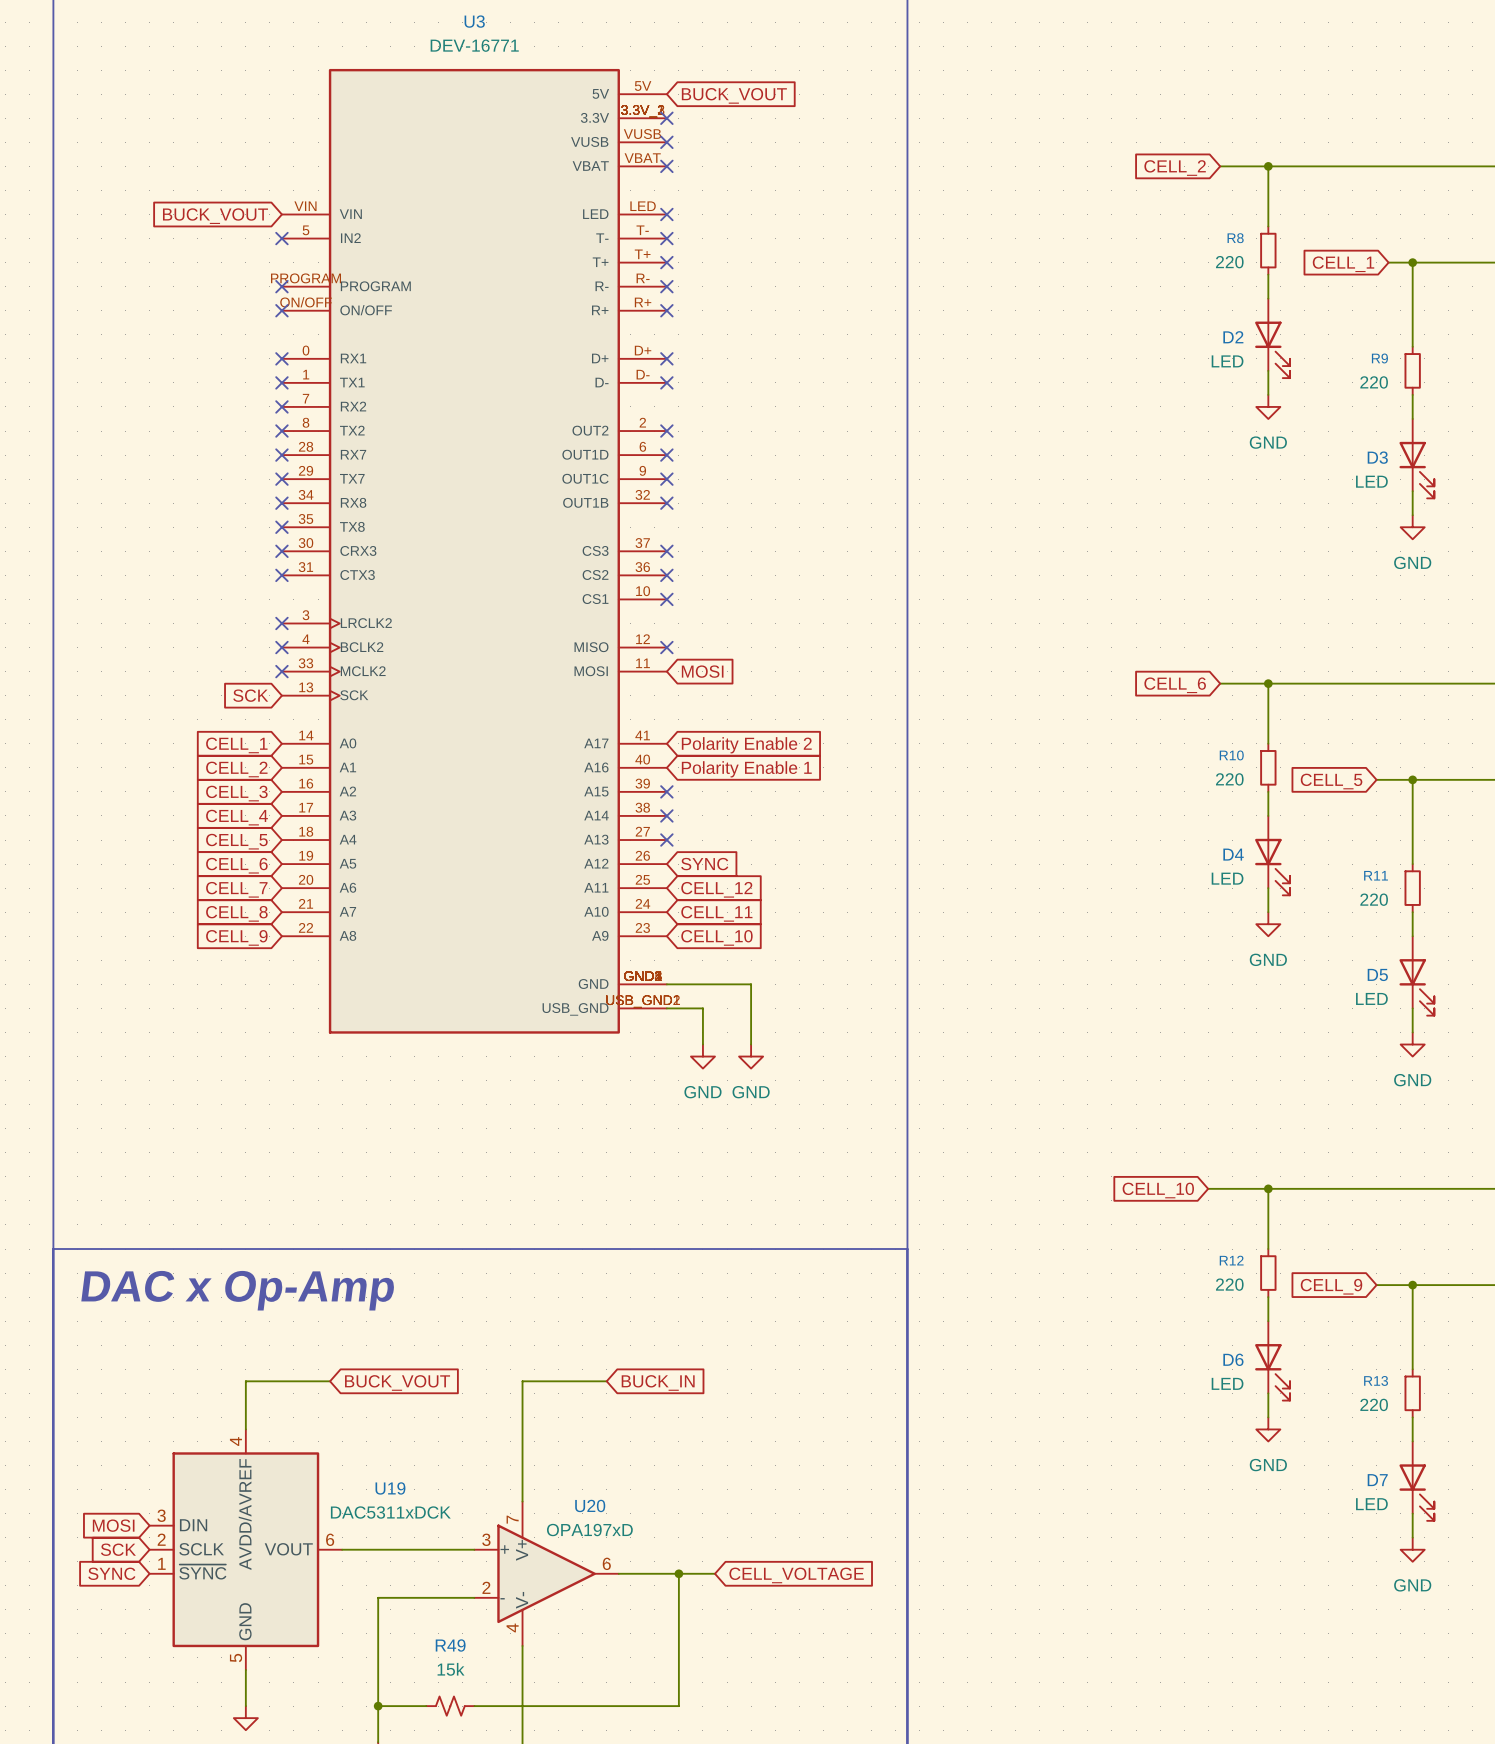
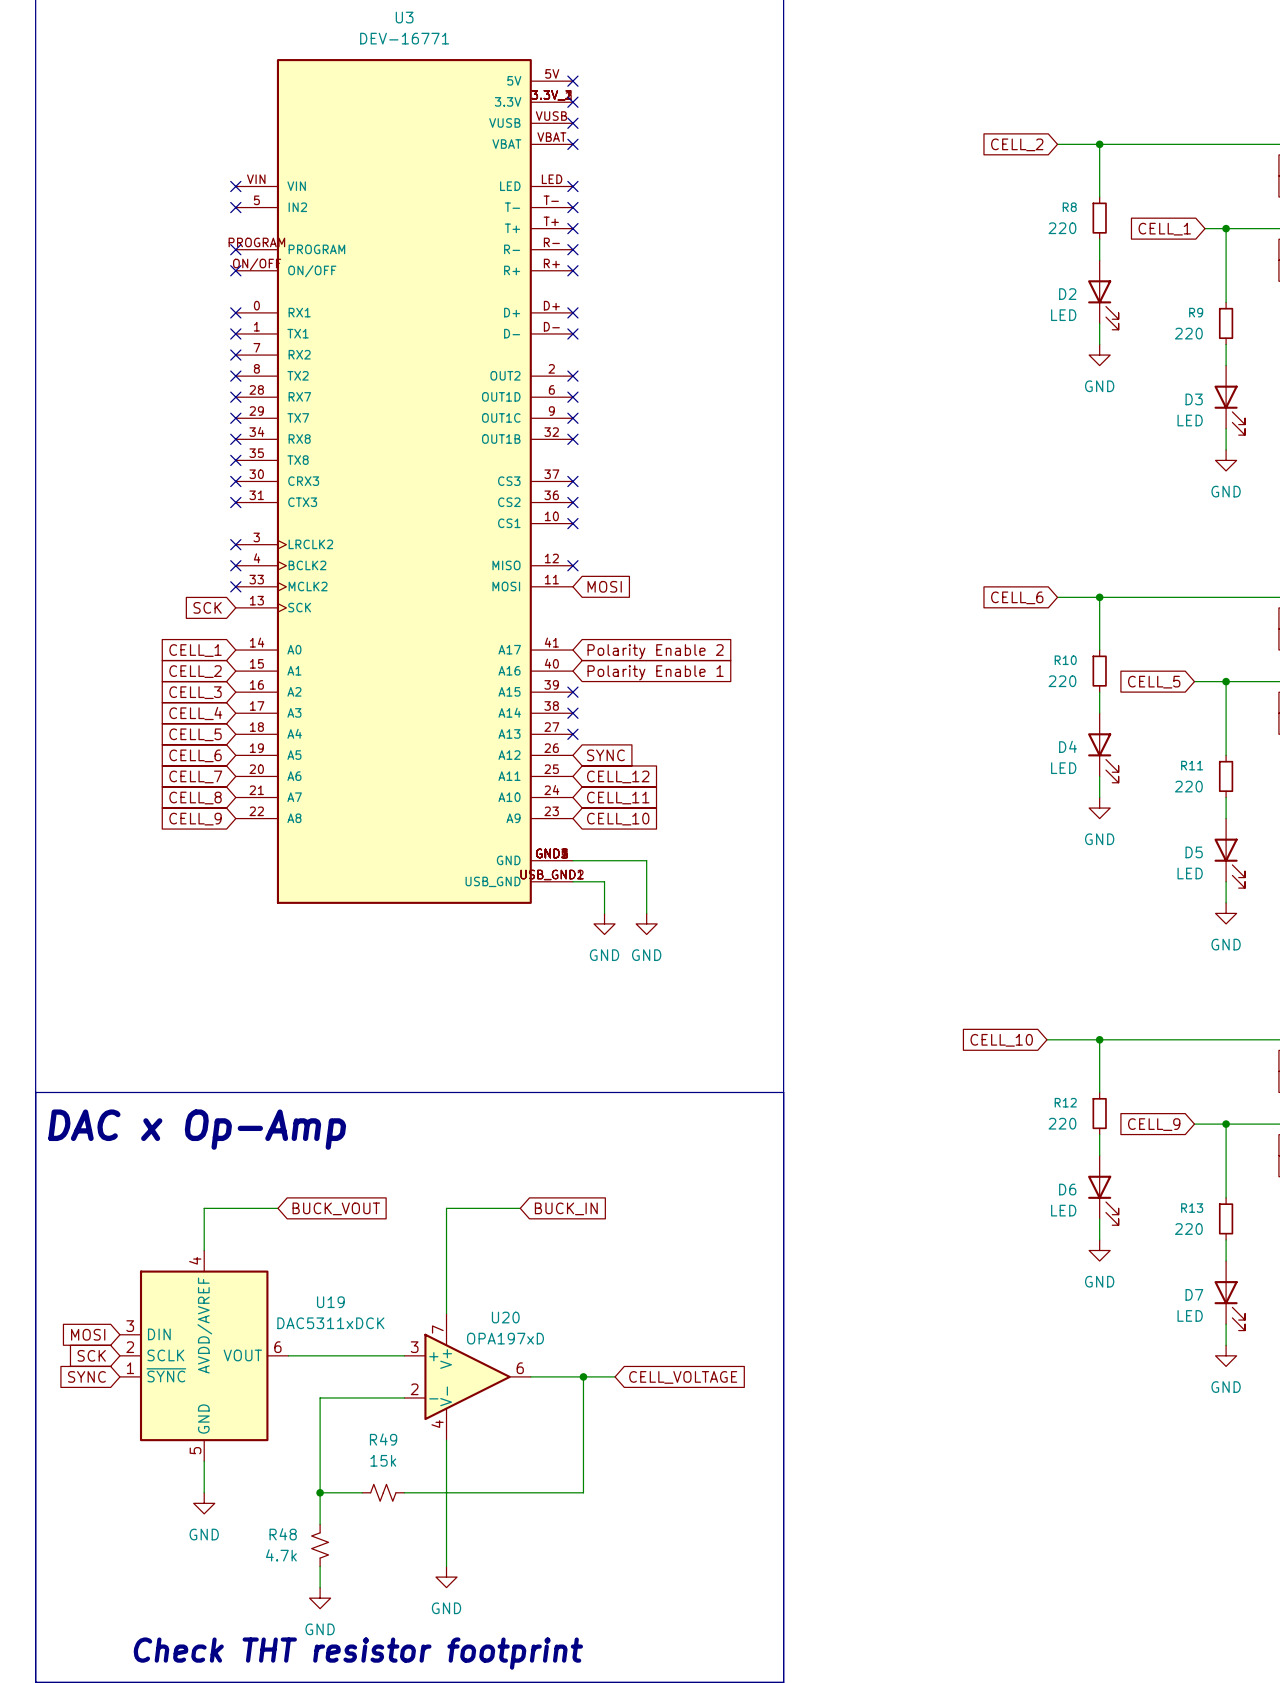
no-connect mark: none -> (572, 81)
global label: BUCK_VOUT (734, 95) -> none
no-connect mark: none -> (235, 186)
global label: BUCK_VOUT (215, 216) -> none

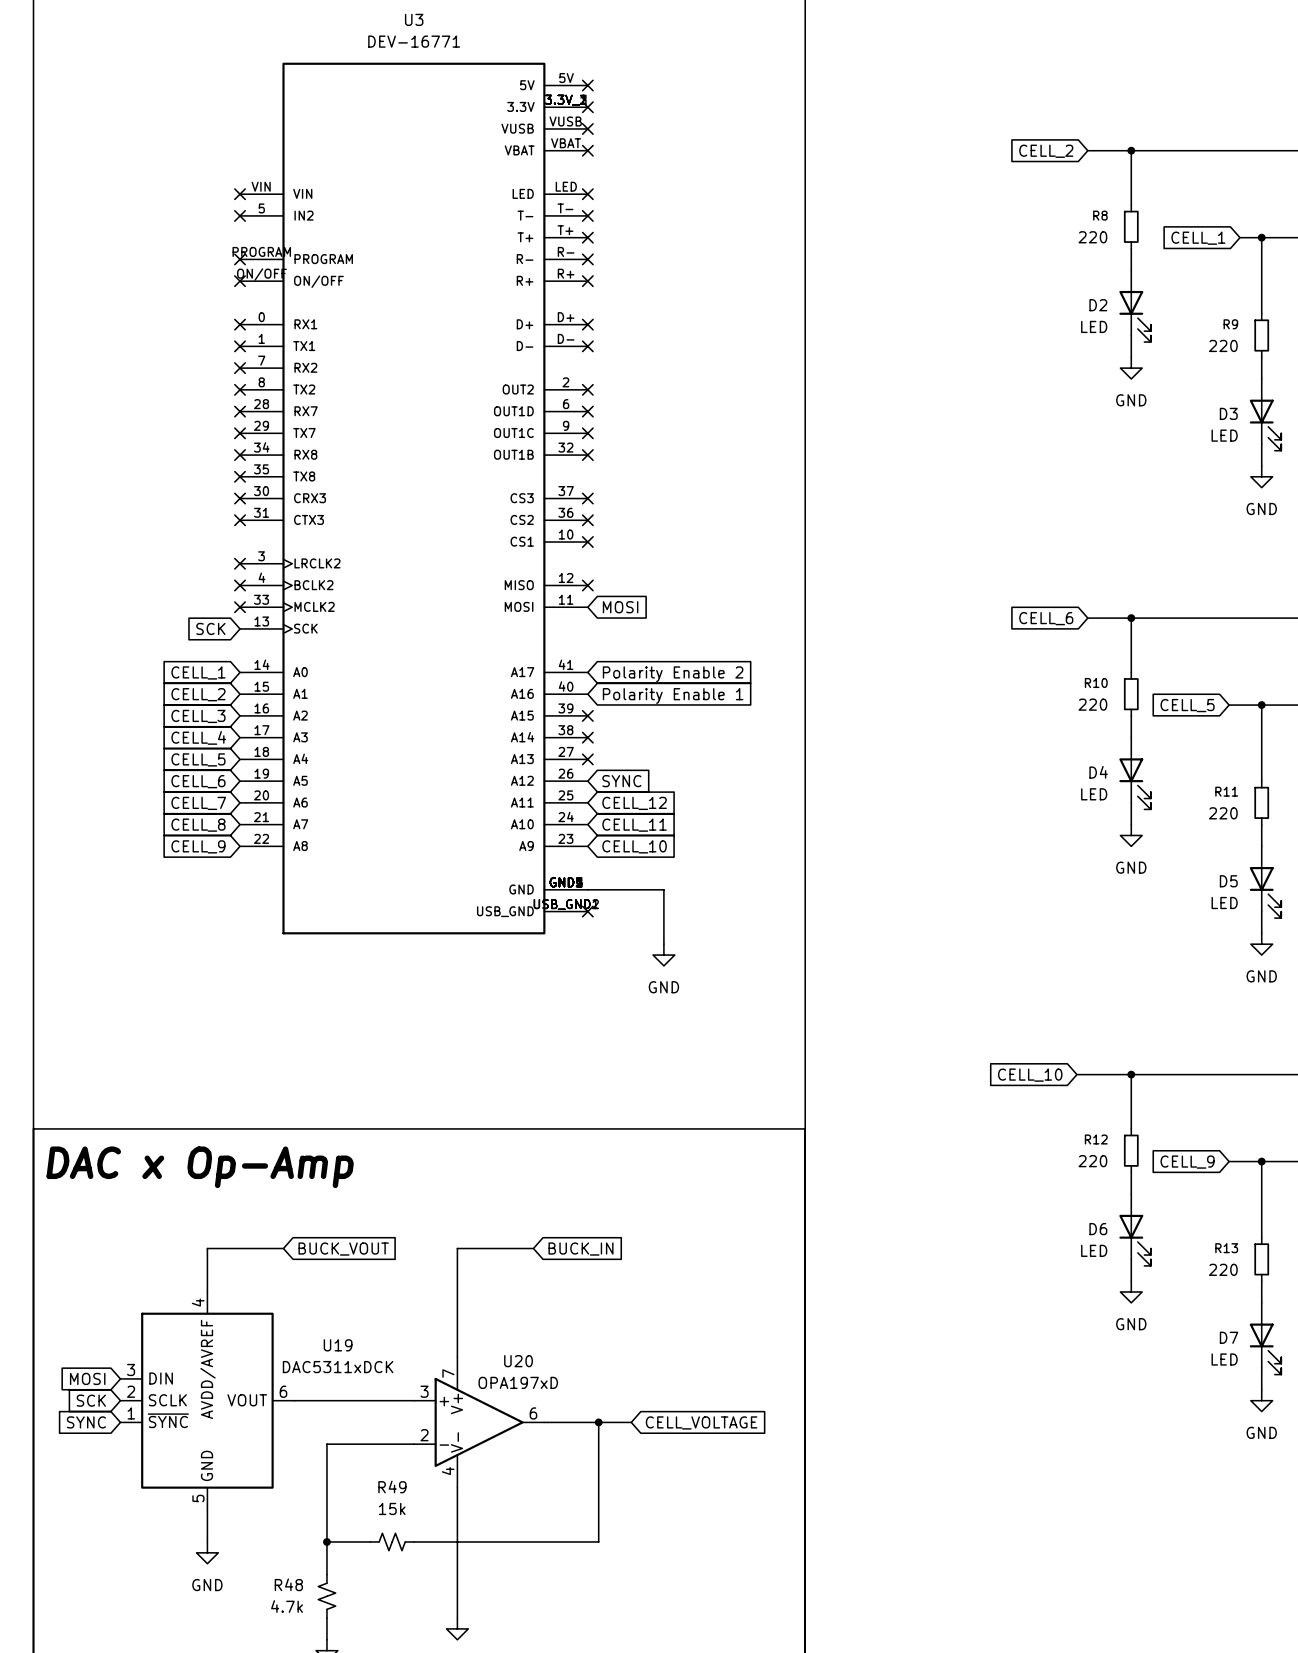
wire: (572, 881) (604, 881) (604, 913) -> none
no-connect mark: none -> (587, 911)
power symbol: GND (604, 923) -> none

